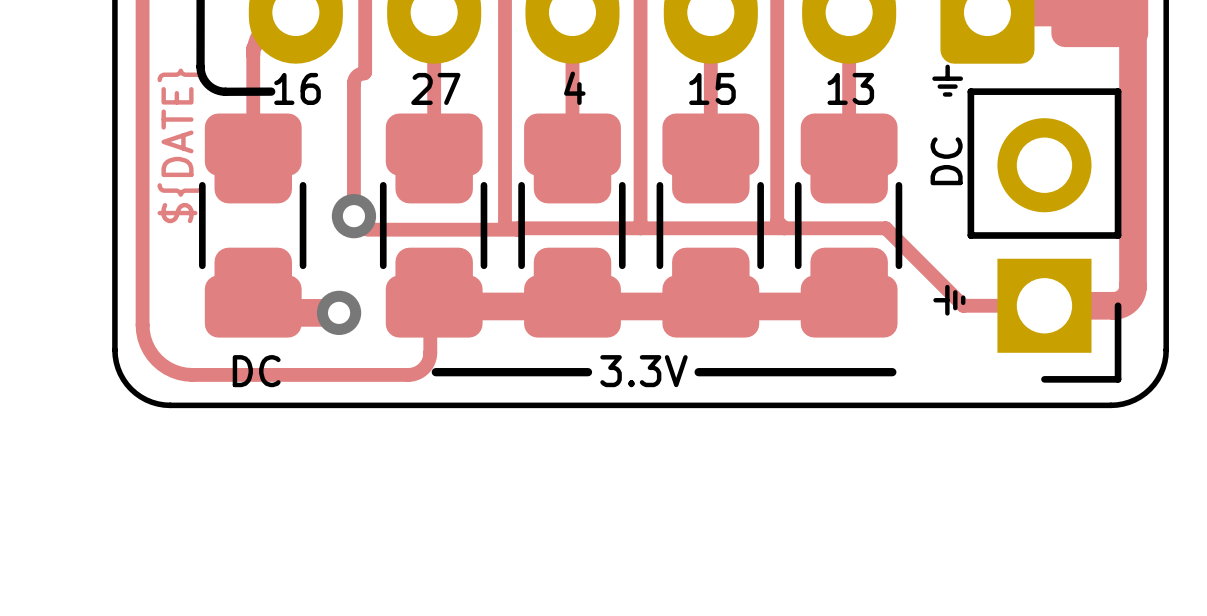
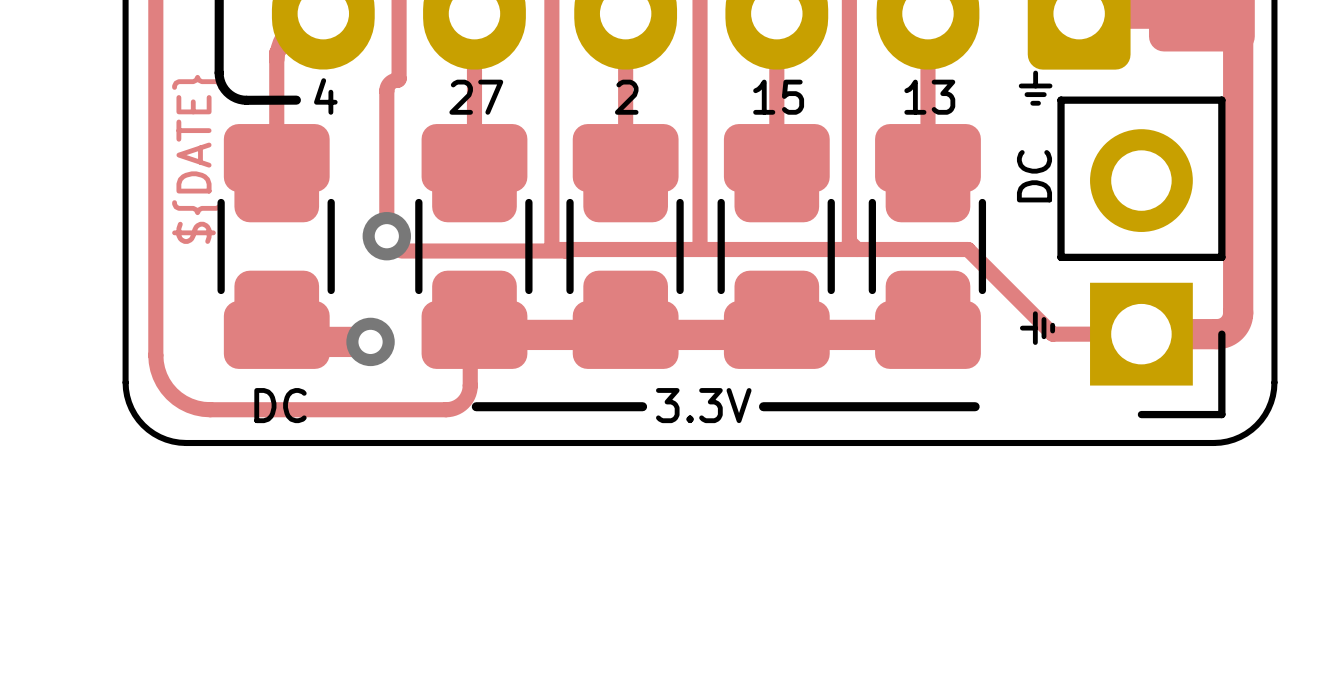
text: 16 (297, 88) -> 4 (325, 96)
text: 4 (574, 88) -> 2 (626, 97)

